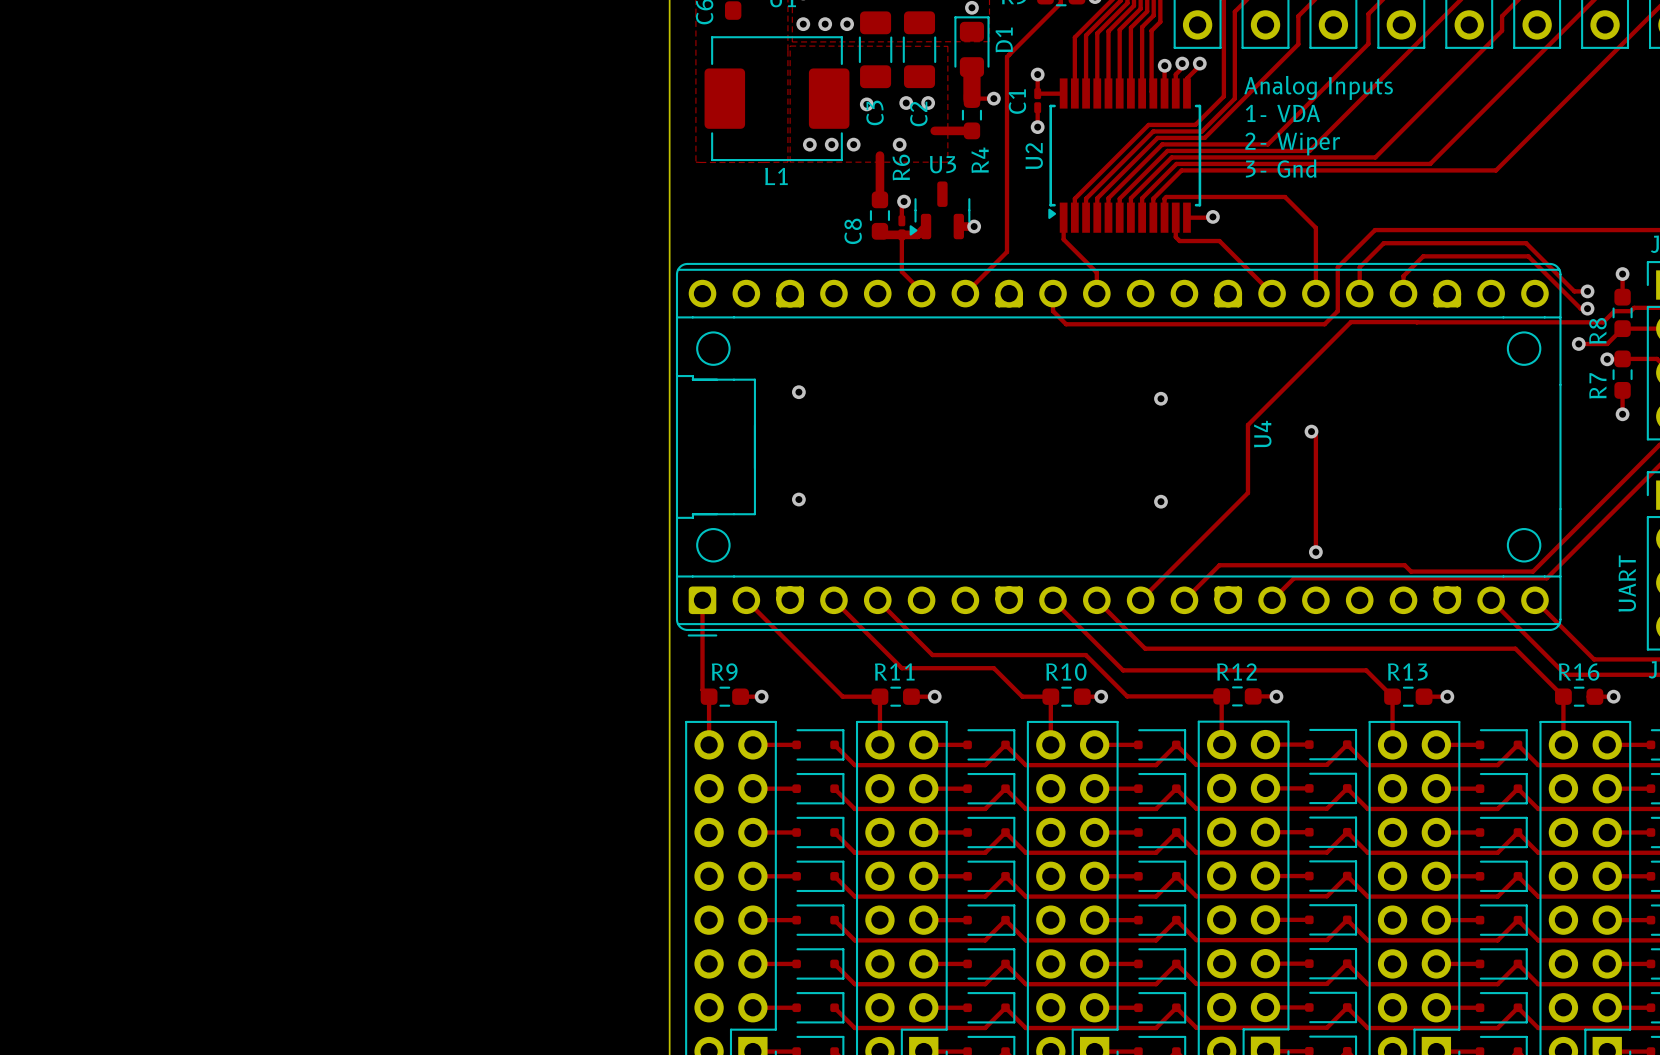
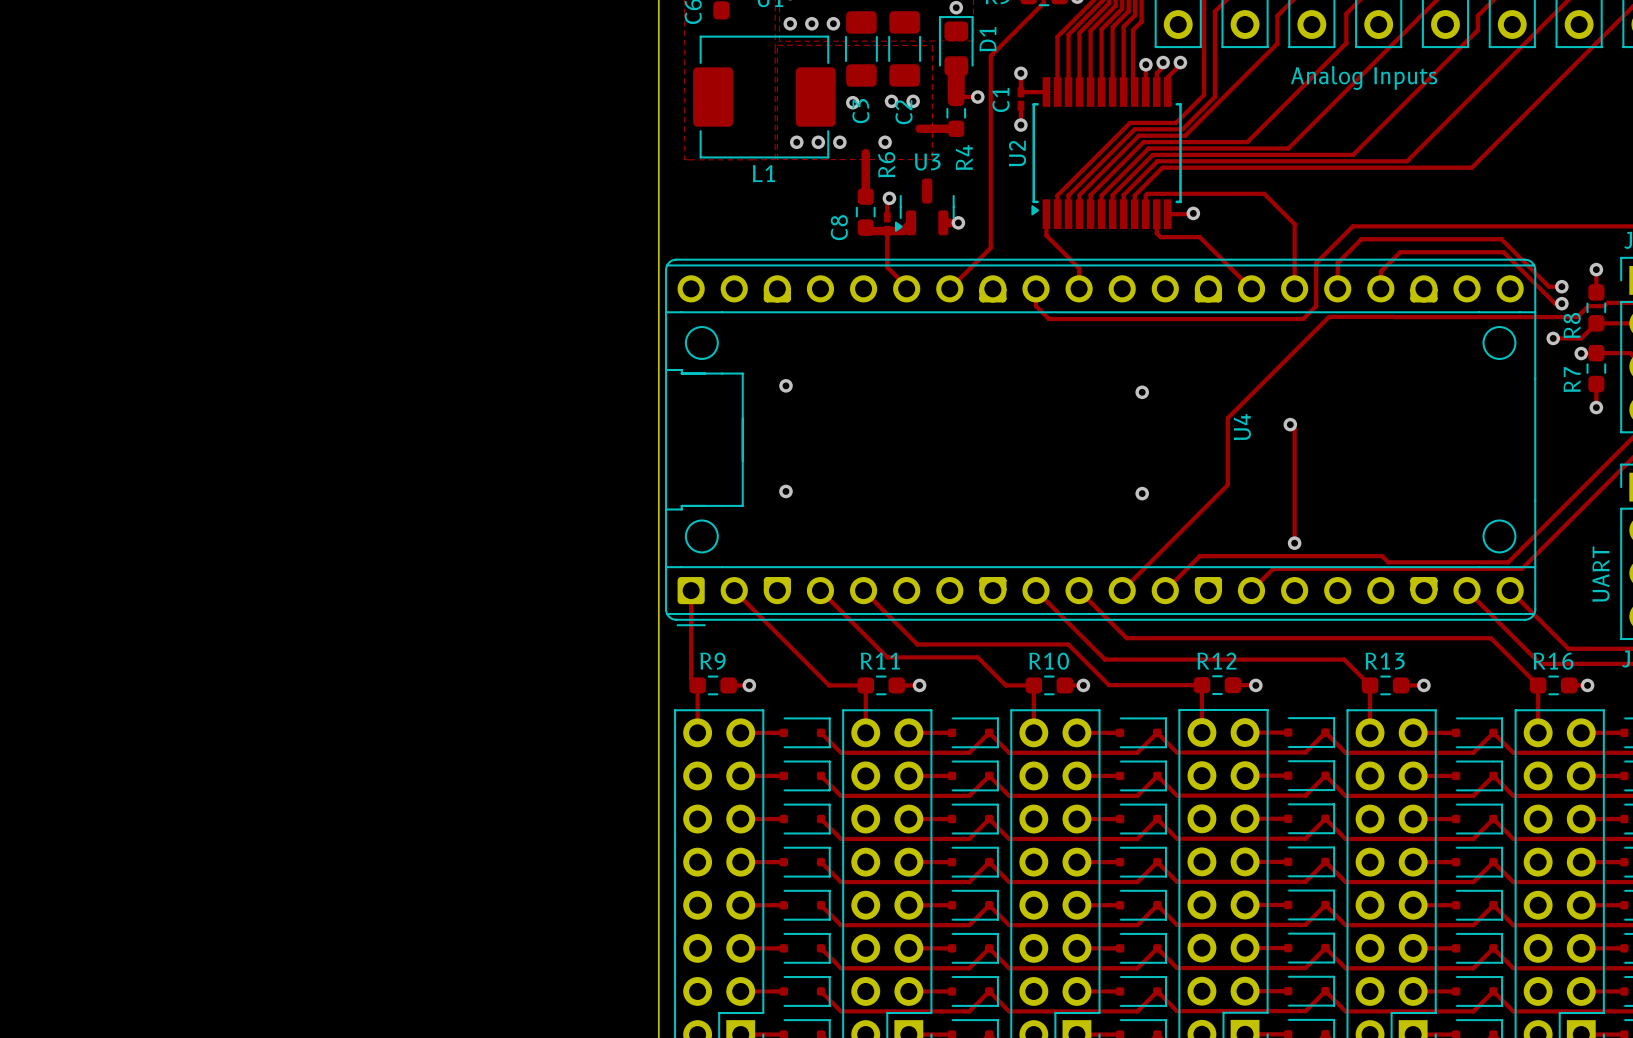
text position: Analog Inputs (1318, 88) -> Analog Inputs (1364, 78)
text: 1- VDA (1282, 113) -> none
text: 2- Wiper (1292, 144) -> none
text: 3- Gnd (1281, 168) -> none

